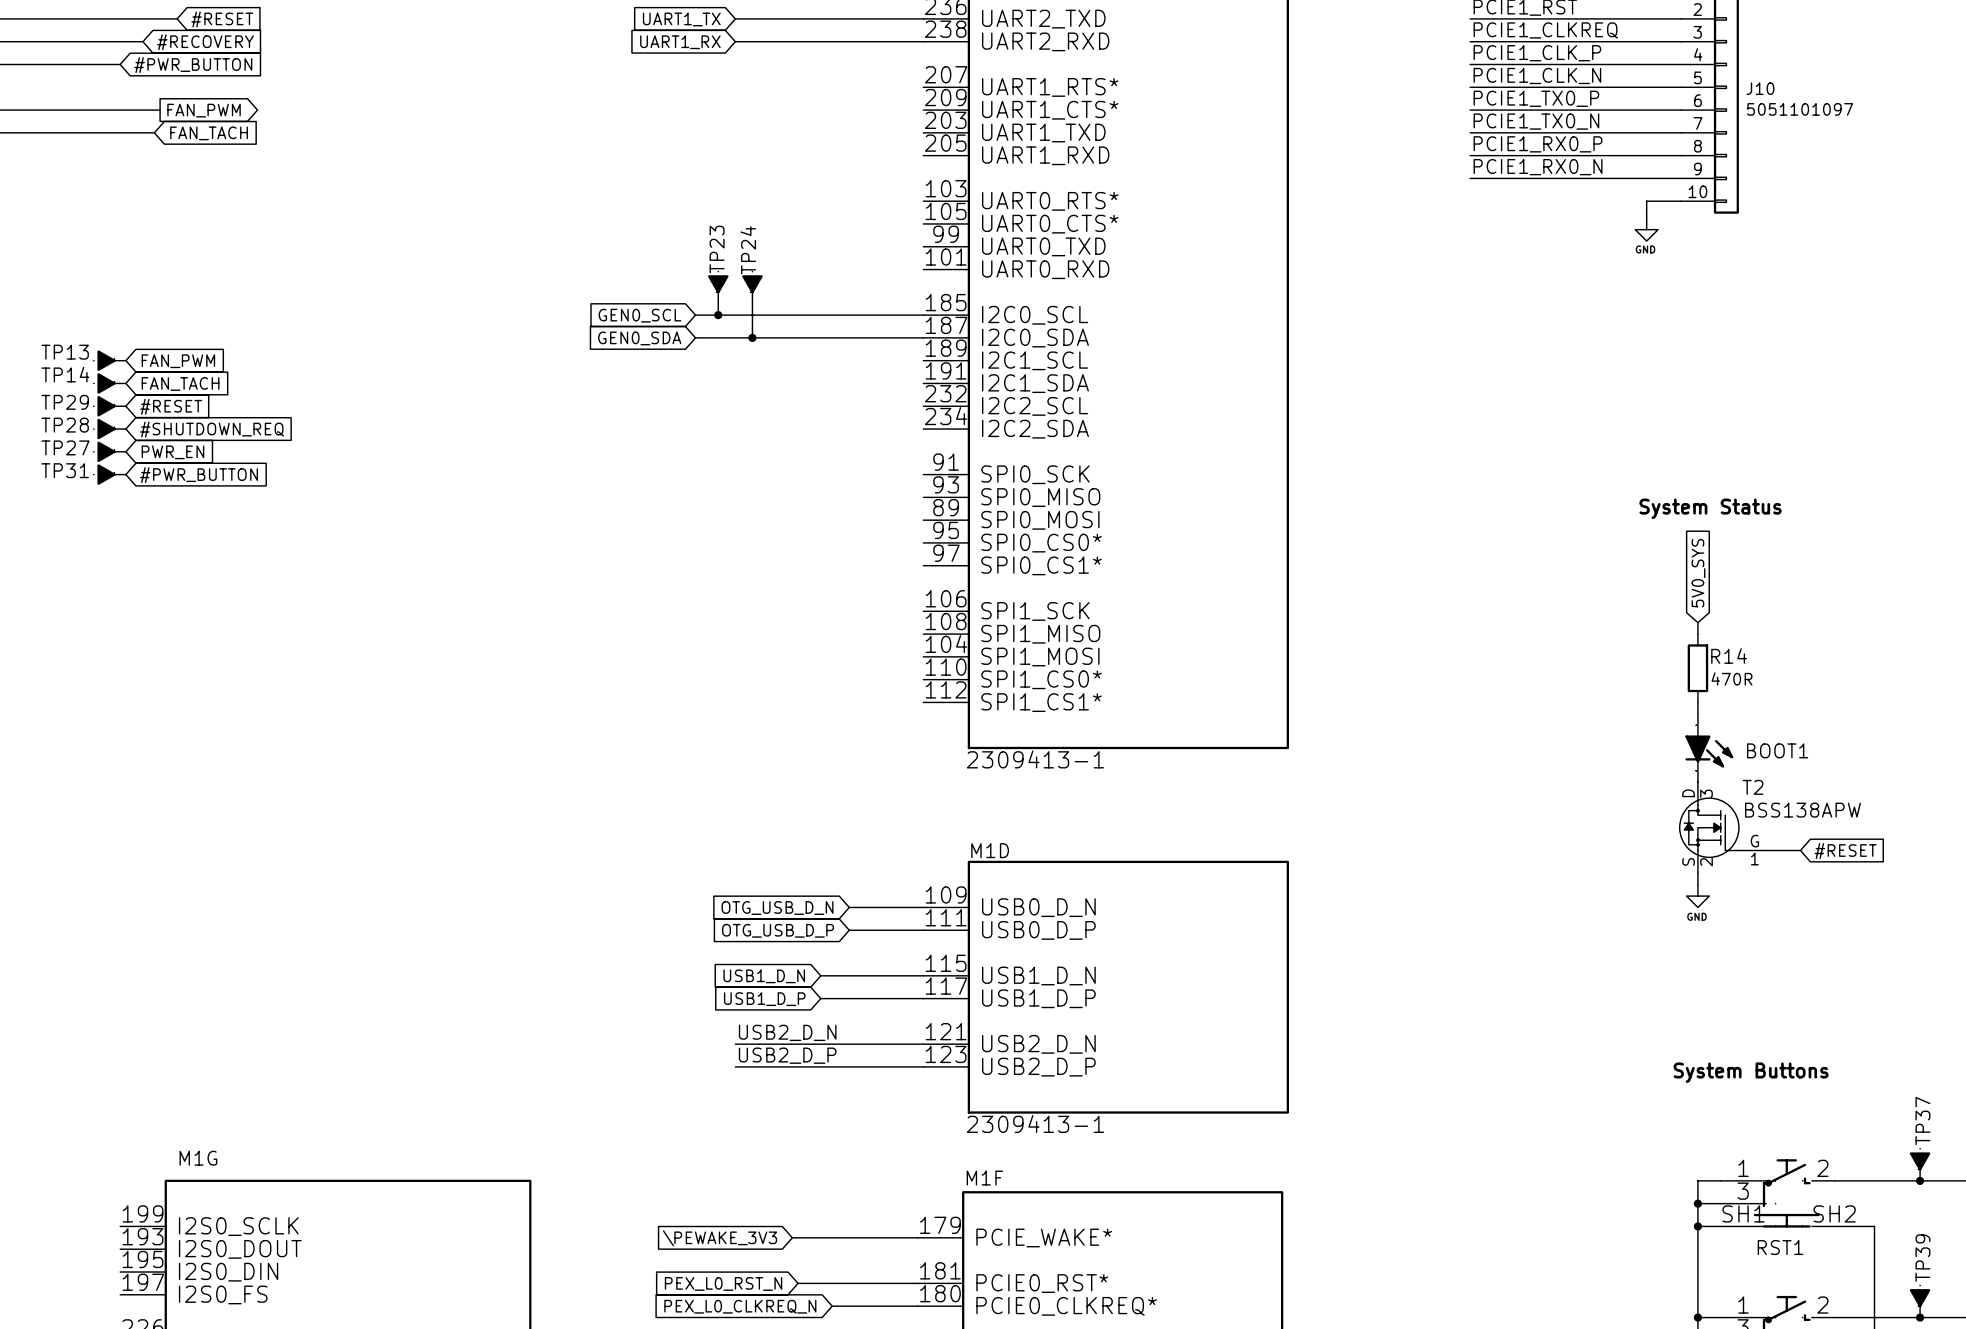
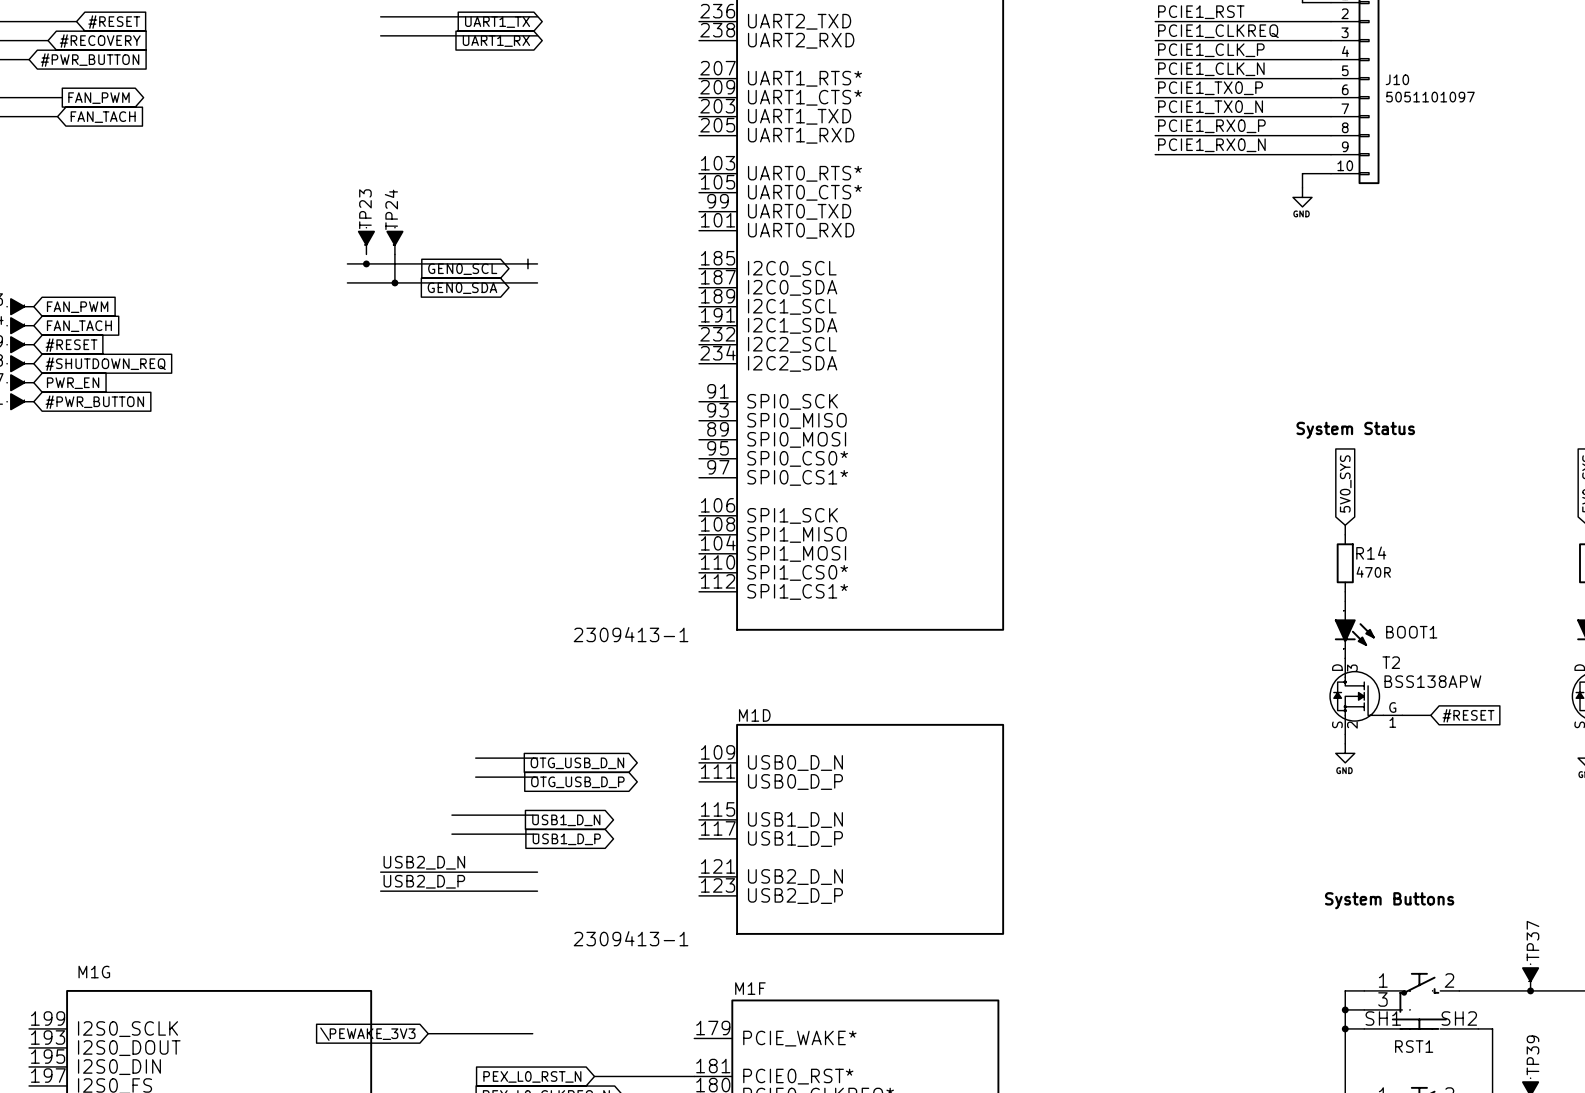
wire: (735, 18) (923, 18) -> (380, 16) (537, 16)
wire: (735, 41) (923, 41) -> (380, 35) (537, 35)
TP23 position: (718, 289) -> (366, 242)
TP24 position: (752, 289) -> (394, 242)
wire: (752, 303) (752, 337) -> (394, 254) (394, 282)
junction: none -> (366, 263)
wire: (695, 315) (923, 315) -> (347, 263) (537, 263)
junction: (718, 315) -> none
junction: none -> (394, 282)
wire: (695, 337) (923, 337) -> (347, 282) (537, 282)
junction: (752, 337) -> none
label position: 2309413-1 (1035, 759) -> 2309413-1 (631, 634)
wire: (849, 907) (923, 907) -> (475, 758) (537, 758)
wire: (849, 930) (923, 930) -> (475, 777) (537, 777)
wire: (820, 975) (923, 975) -> (451, 815) (537, 815)
wire: (820, 998) (923, 998) -> (451, 834) (537, 834)
label position: USB2_D_N (787, 1032) -> USB2_D_N (424, 862)
wire: (735, 1044) (923, 1044) -> (380, 872) (537, 872)
label position: USB2_D_P (787, 1055) -> USB2_D_P (424, 881)
wire: (735, 1066) (923, 1066) -> (380, 891) (537, 891)
label position: 2309413-1 (1035, 1123) -> 2309413-1 (631, 938)
wire: (792, 1237) (917, 1237) -> (428, 1033) (532, 1033)
global label position: \PEWAKE_3V3 (720, 1238) -> \PEWAKE_3V3 (367, 1034)

